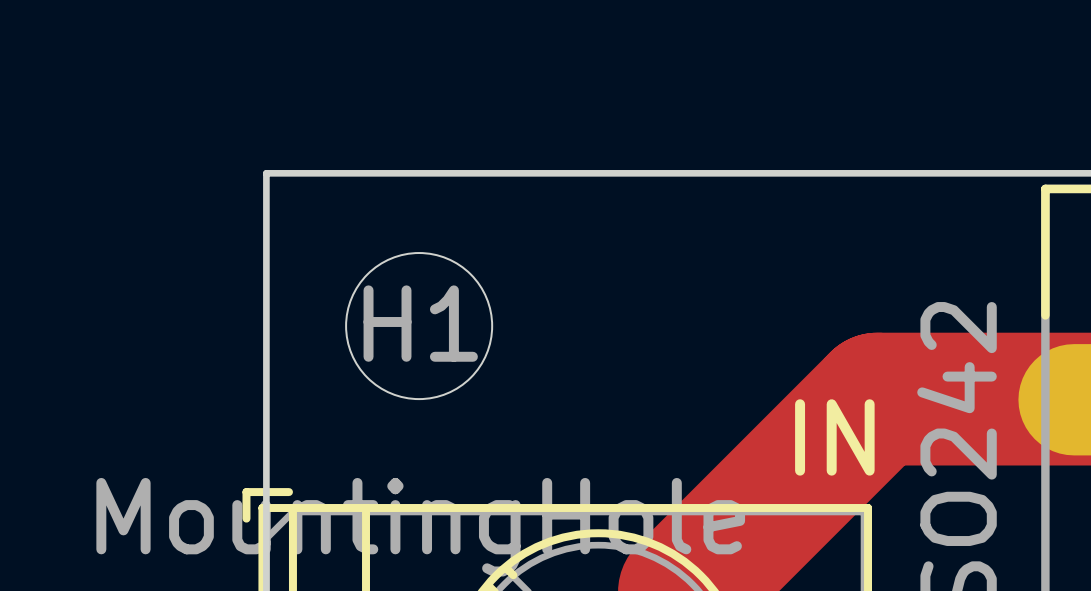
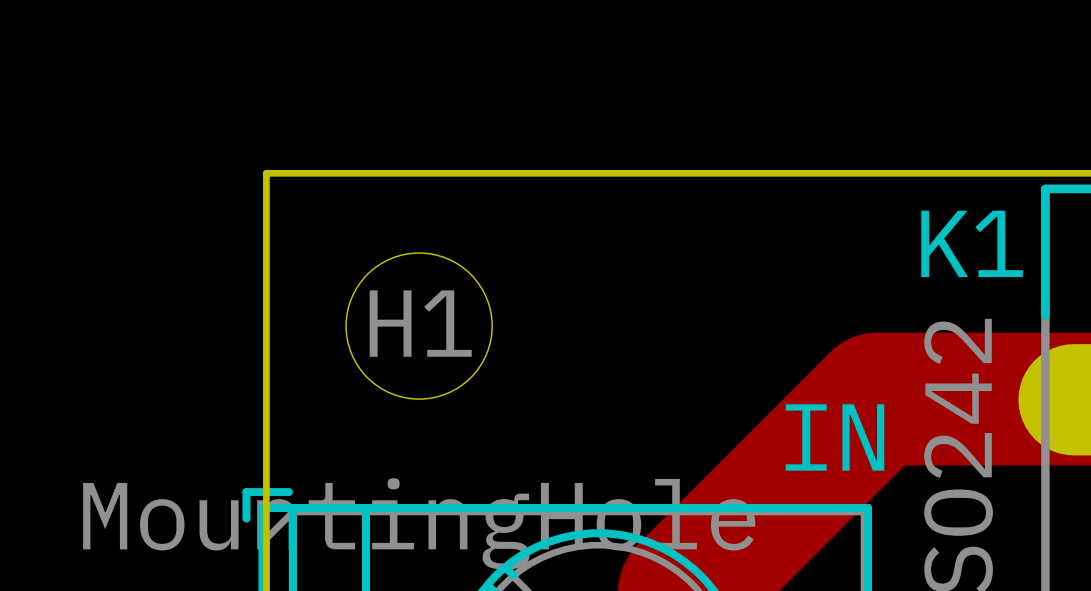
K1 name: none -> K1 (972, 243)

